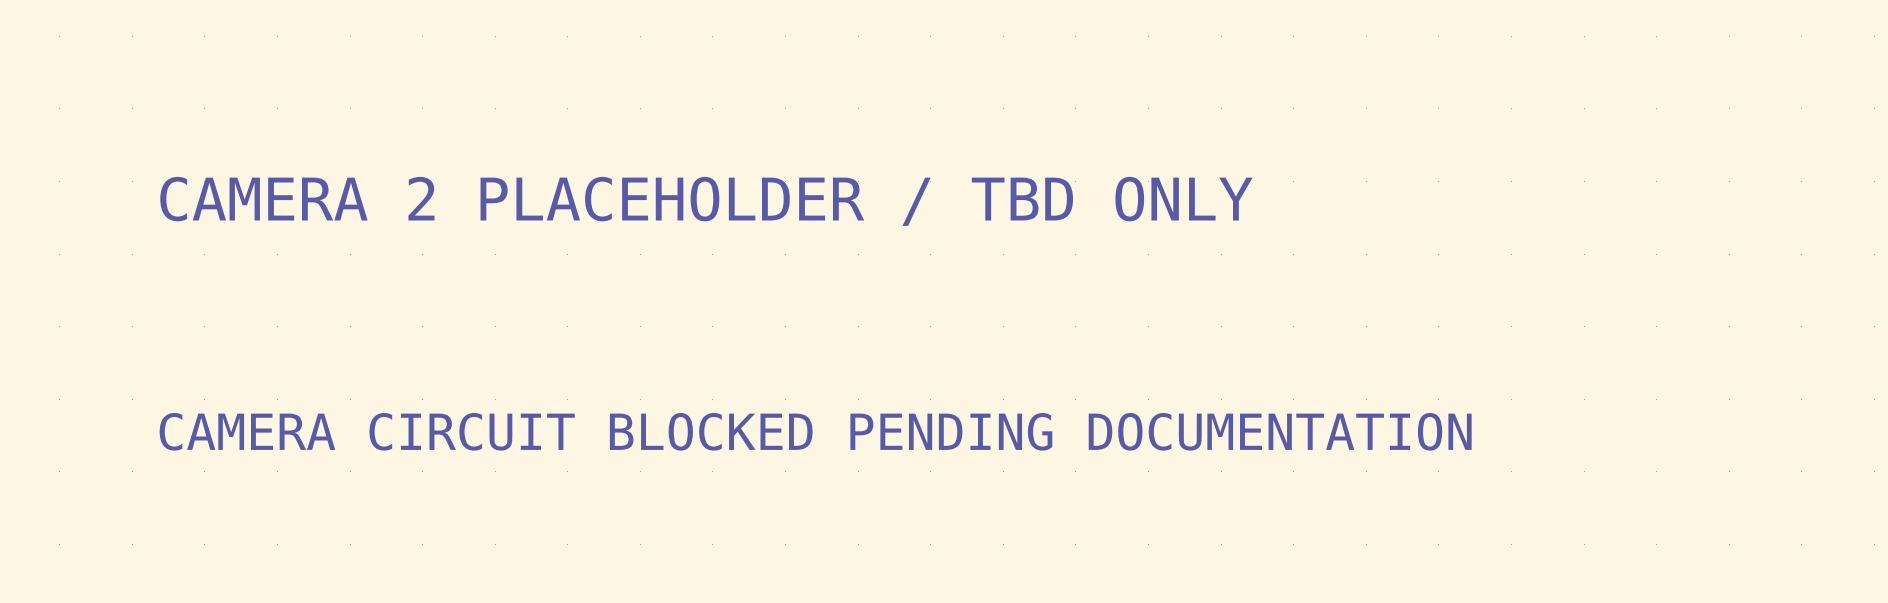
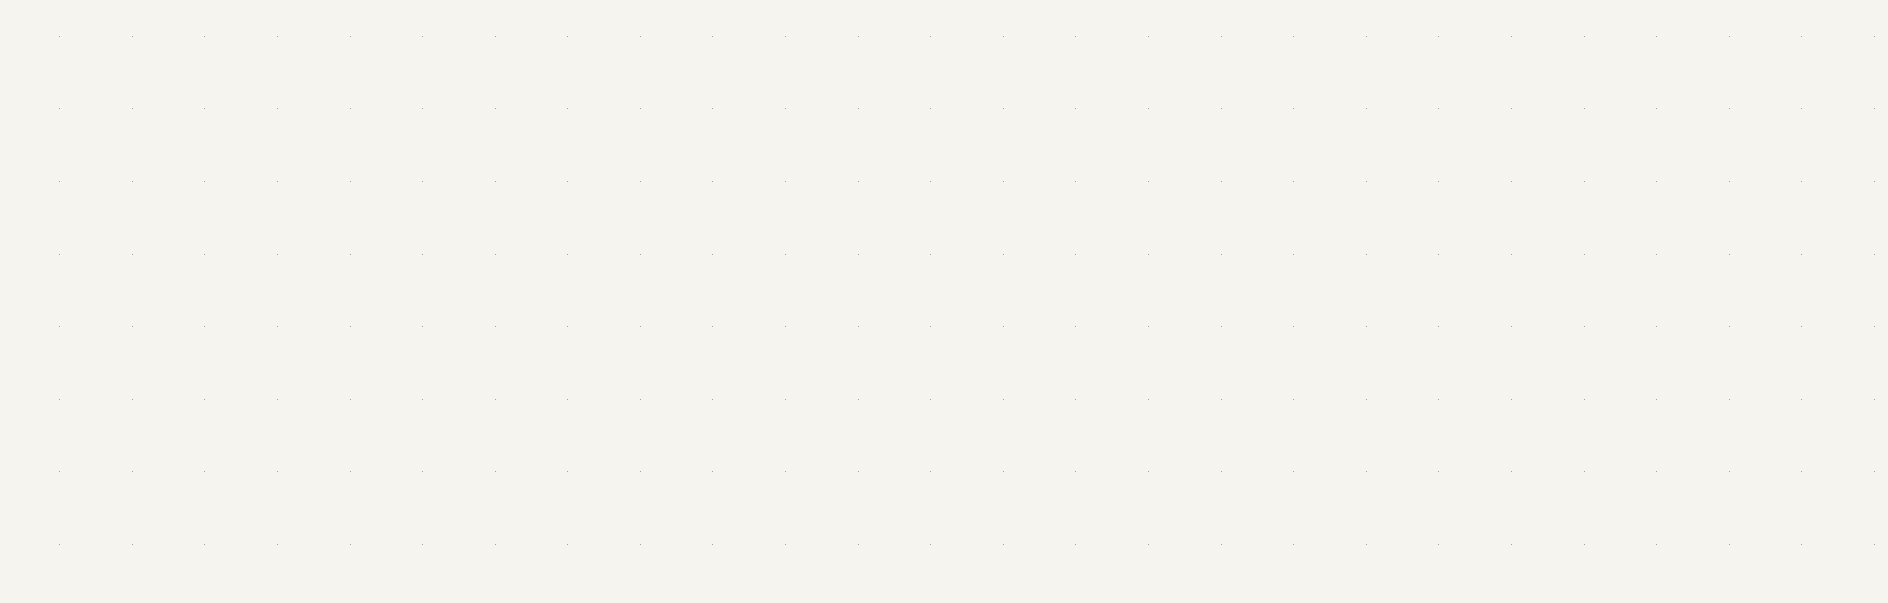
text: CAMERA 2 PLACEHOLDER / TBD ONLY (706, 201) -> none
text: CAMERA CIRCUIT BLOCKED PENDING DOCUMENTATION (815, 431) -> none

